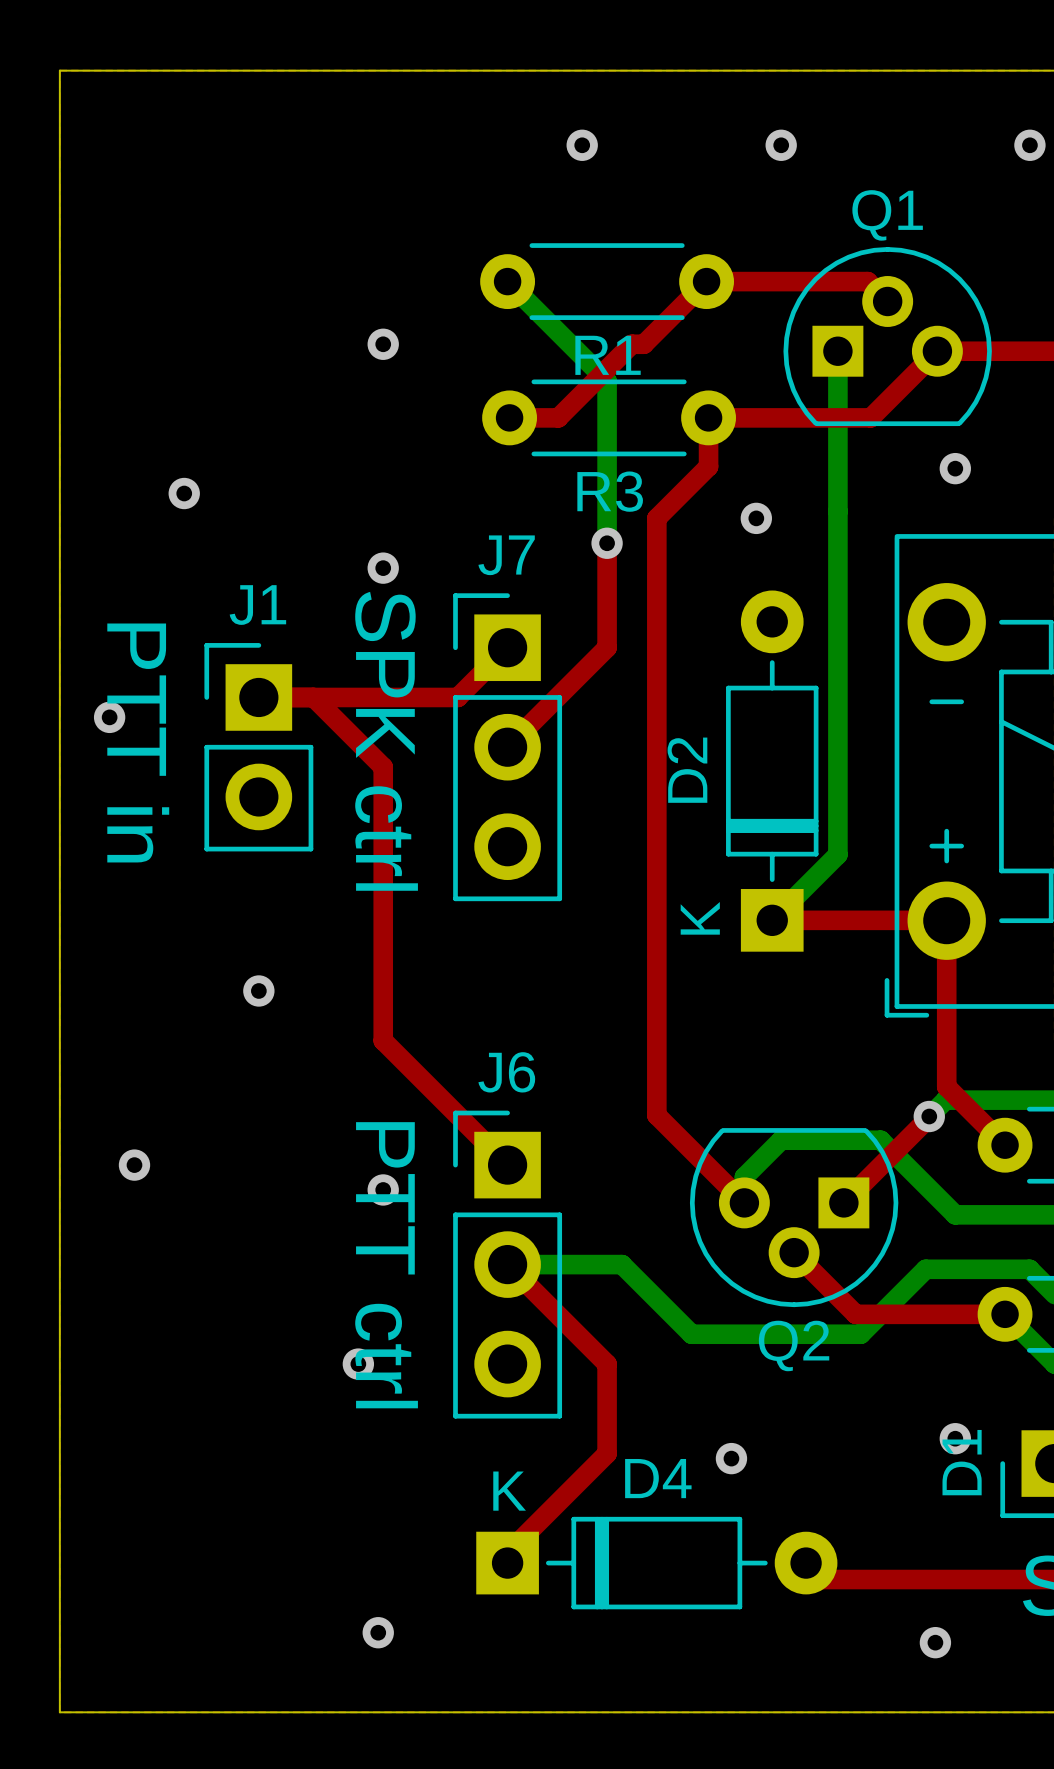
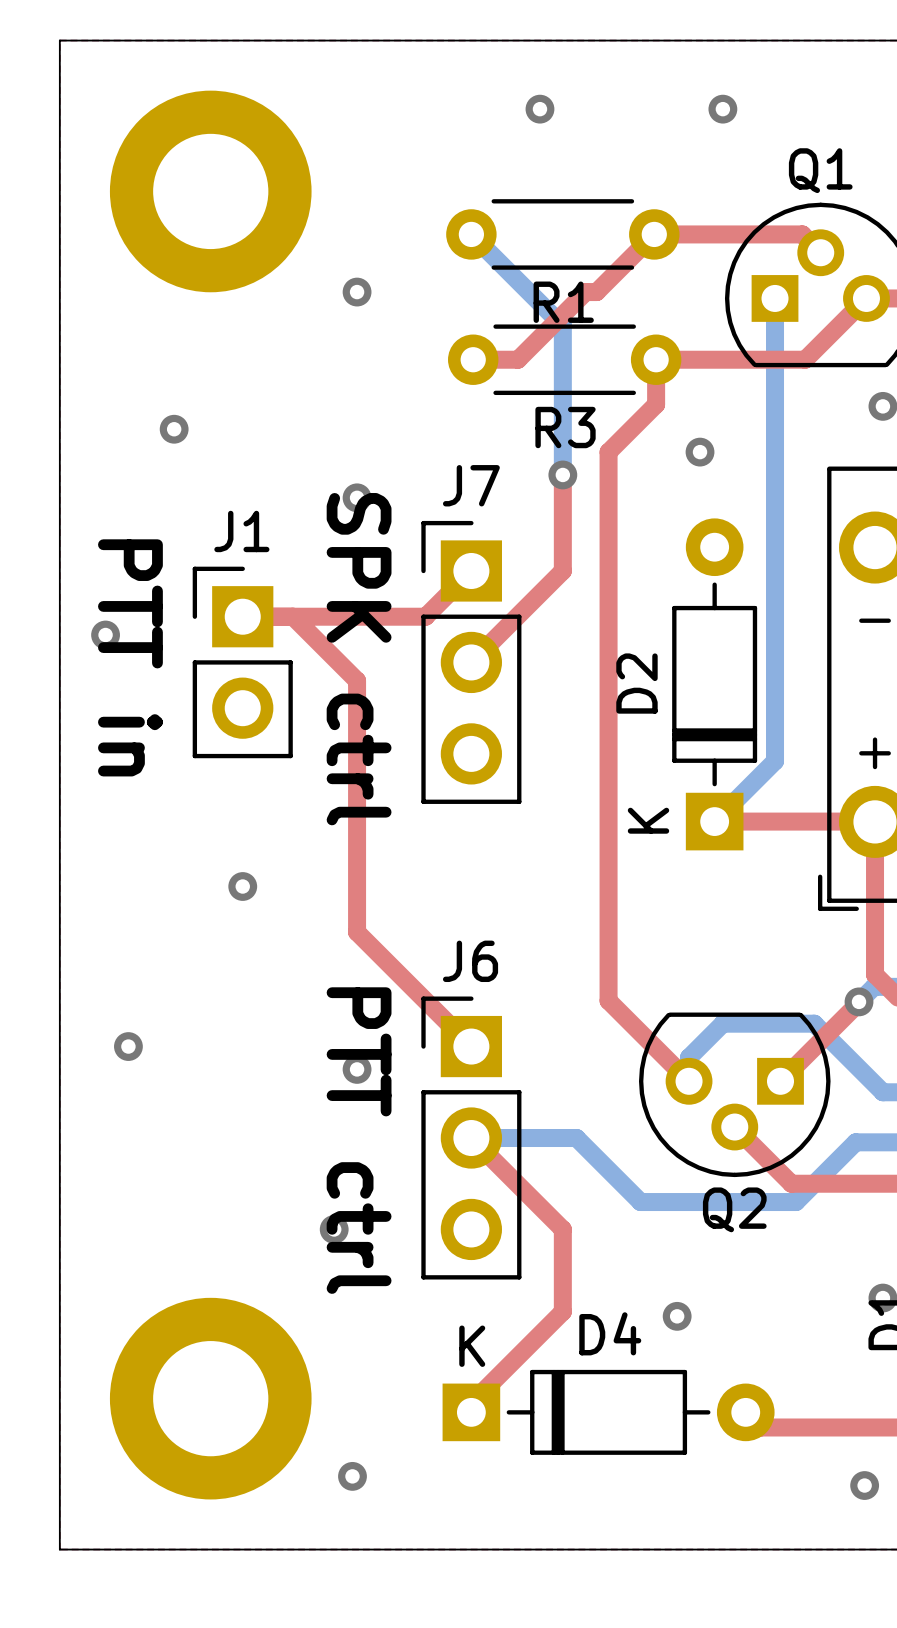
part: none -> (210, 191)
part: none -> (210, 1398)

